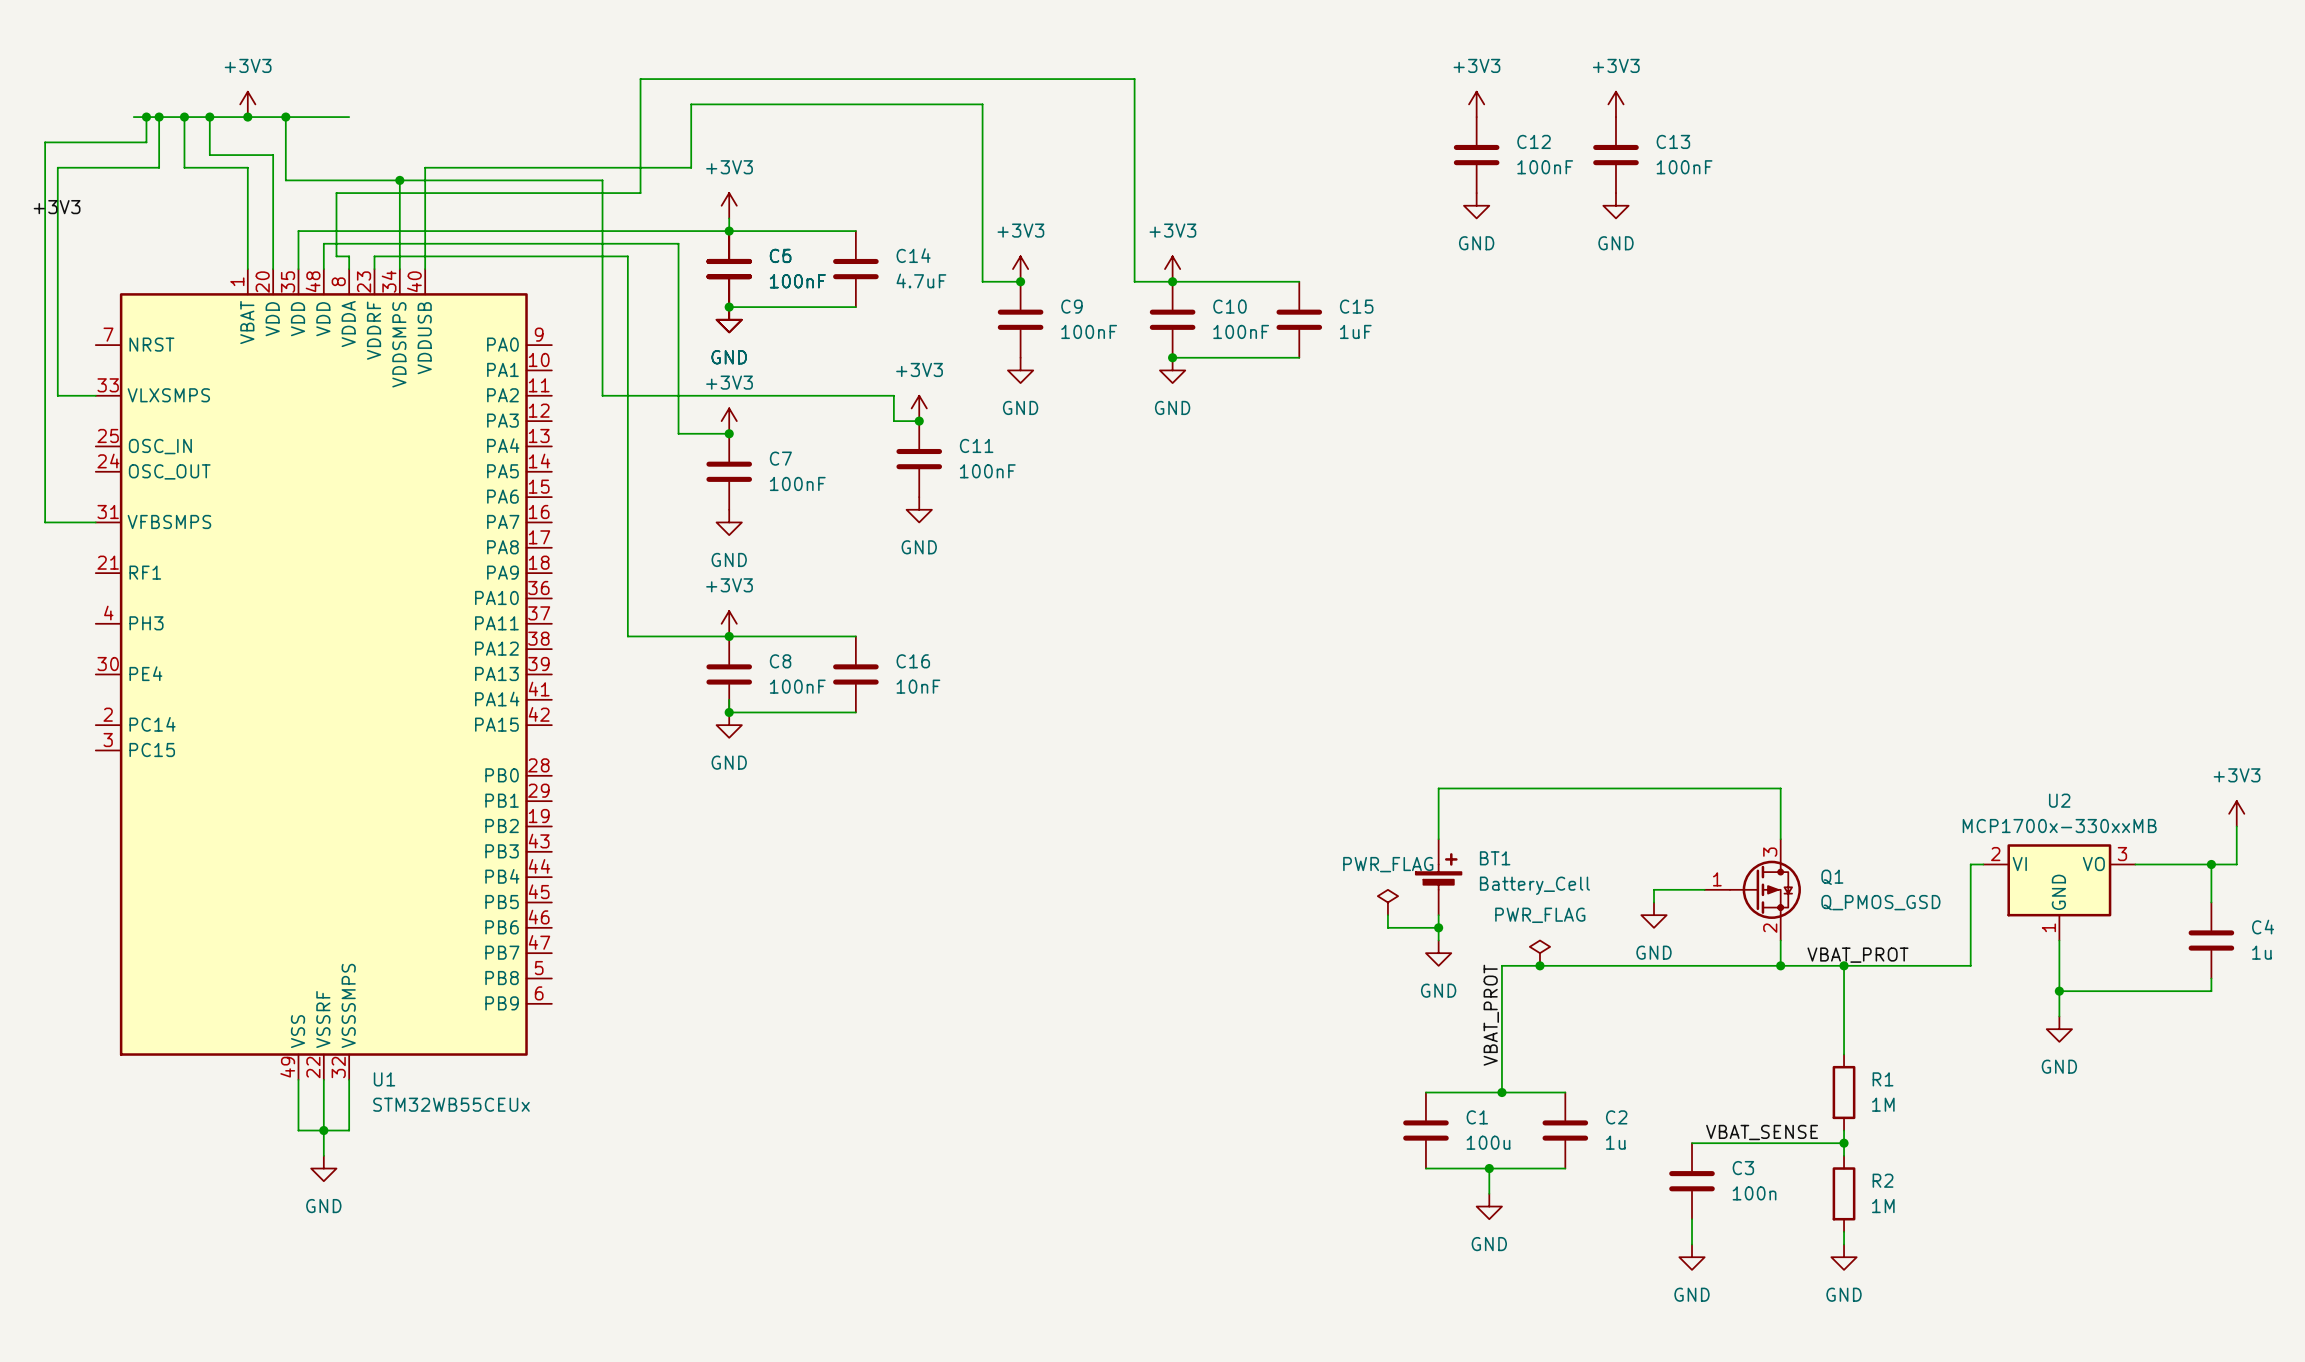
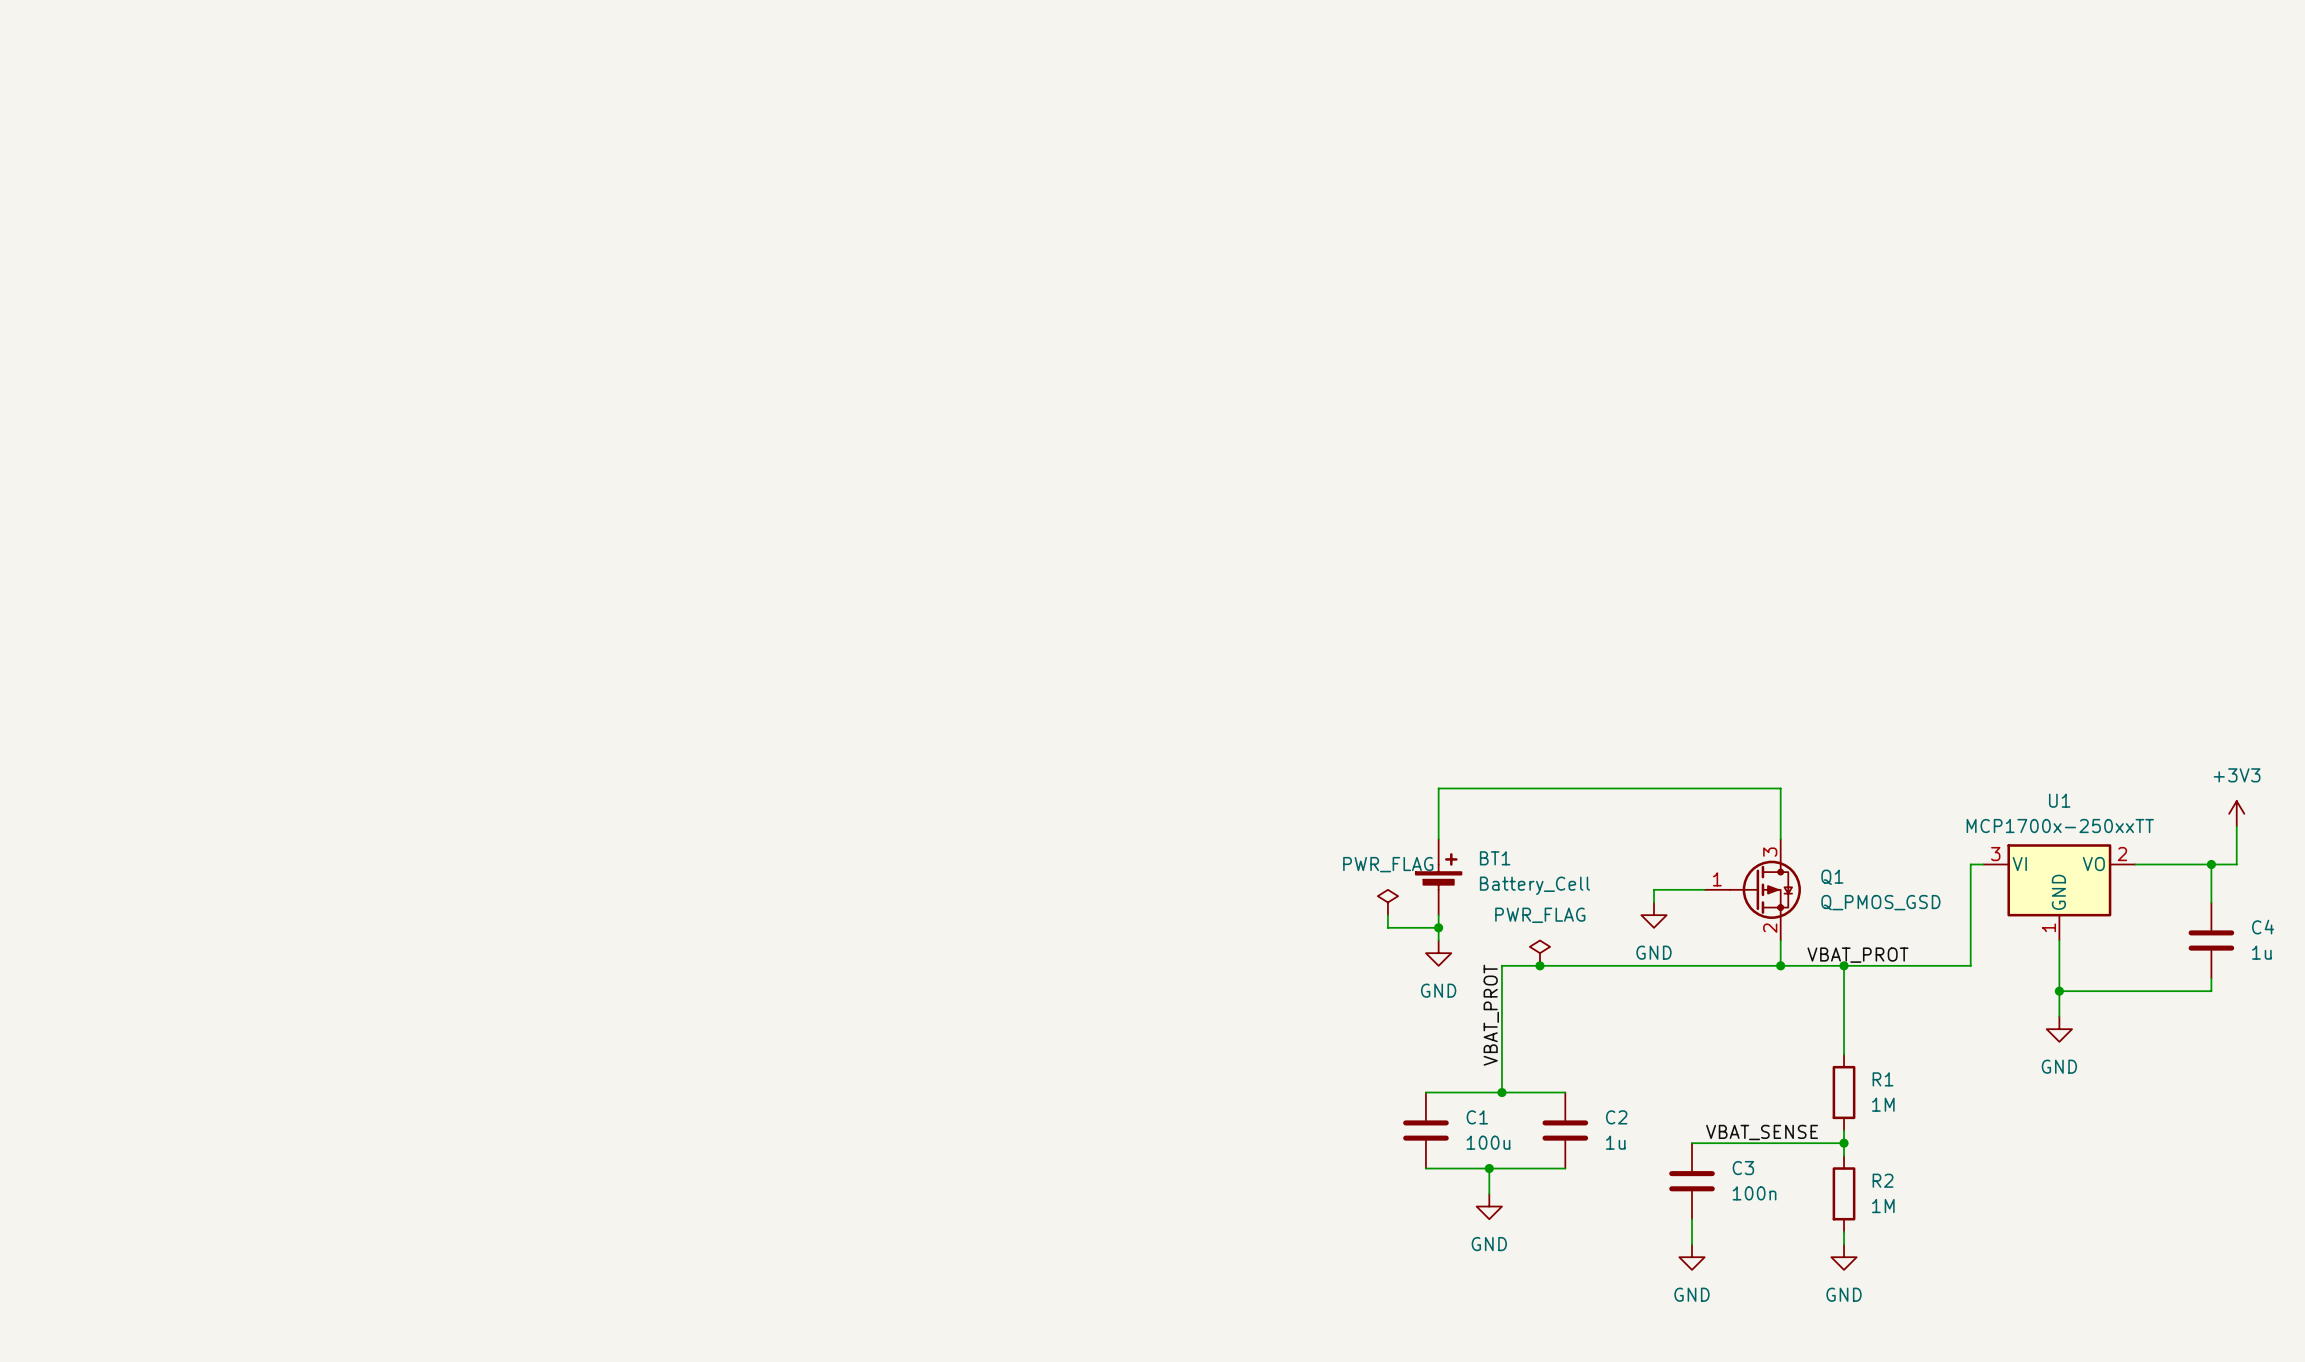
power symbol: +3V3 (247, 104) -> none
power symbol: +3V3 (1476, 104) -> none
power symbol: +3V3 (1615, 104) -> none
wire: (133, 117) (349, 117) -> none
wire: (146, 117) (146, 142) (45, 142) (45, 522) (95, 522) -> none
junction: (146, 117) -> none
wire: (159, 117) (159, 167) (57, 167) (57, 395) (95, 395) -> none
junction: (159, 117) -> none
wire: (184, 117) (184, 167) (247, 167) (247, 269) -> none
junction: (184, 117) -> none
wire: (209, 117) (209, 155) (273, 155) (273, 269) -> none
junction: (209, 117) -> none
junction: (247, 117) -> none
wire: (285, 117) (285, 180) (602, 180) (602, 395) (893, 395) (893, 421) (919, 421) -> none
junction: (285, 117) -> none
C12: 100nF (1476, 155) -> none
C13: 100nF (1615, 155) -> none
wire: (399, 180) (399, 269) -> none
junction: (399, 180) -> none
power symbol: +3V3 (729, 205) -> none
power symbol: GND (1476, 205) -> none
power symbol: GND (1615, 205) -> none
label: +3V3 (57, 207) -> none
wire: (729, 218) (729, 231) -> none
junction: (729, 231) -> none
wire: (855, 231) (298, 231) (298, 269) -> none
U1 symbol: [95, 269, 552, 1080] -> [1983, 844, 2136, 941]
wire: (323, 269) (323, 243) (678, 243) (678, 433) (729, 433) -> none
wire: (349, 269) (349, 256) (336, 256) (336, 193) (640, 193) (640, 79) (1134, 79) (1134, 281) (1299, 281) -> none
wire: (374, 269) (374, 256) (627, 256) (627, 636) (855, 636) -> none
wire: (425, 269) (425, 167) (691, 167) (691, 104) (982, 104) (982, 281) (1020, 281) -> none
part: 100nF (729, 269) -> none
part: 100nF (729, 269) -> none
C14: 4.7uF (855, 269) -> none
power symbol: +3V3 (1020, 269) -> none
power symbol: +3V3 (1172, 269) -> none
junction: (1020, 281) -> none
junction: (1172, 281) -> none
wire: (729, 307) (855, 307) -> none
junction: (729, 307) -> none
power symbol: GND (729, 319) -> none
C9: 100nF (1020, 319) -> none
C10: 100nF (1172, 319) -> none
C15: 1uF (1299, 319) -> none
wire: (1172, 357) (1299, 357) -> none
junction: (1172, 357) -> none
power symbol: GND (1020, 370) -> none
power symbol: GND (1172, 370) -> none
power symbol: +3V3 (919, 408) -> none
power symbol: +3V3 (729, 421) -> none
junction: (919, 421) -> none
junction: (729, 433) -> none
C11: 100nF (919, 459) -> none
C7: 100nF (729, 471) -> none
power symbol: GND (919, 509) -> none
power symbol: GND (729, 522) -> none
power symbol: +3V3 (729, 623) -> none
junction: (729, 636) -> none
C8: 100nF (729, 674) -> none
C16: 10nF (855, 674) -> none
wire: (729, 699) (729, 712) (855, 712) -> none
junction: (729, 712) -> none
power symbol: GND (729, 725) -> none
U2: MCP1700x-330xxMB (2059, 892) -> none
wire: (298, 1079) (298, 1130) (349, 1130) (349, 1079) -> none
wire: (323, 1079) (323, 1155) -> none
U1 name position: U1 (384, 1079) -> U1 (2059, 800)
U1 value: STM32WB55CEUx (451, 1104) -> MCP1700x-250xxTT (2060, 826)
junction: (323, 1130) -> none
power symbol: GND (323, 1168) -> none

